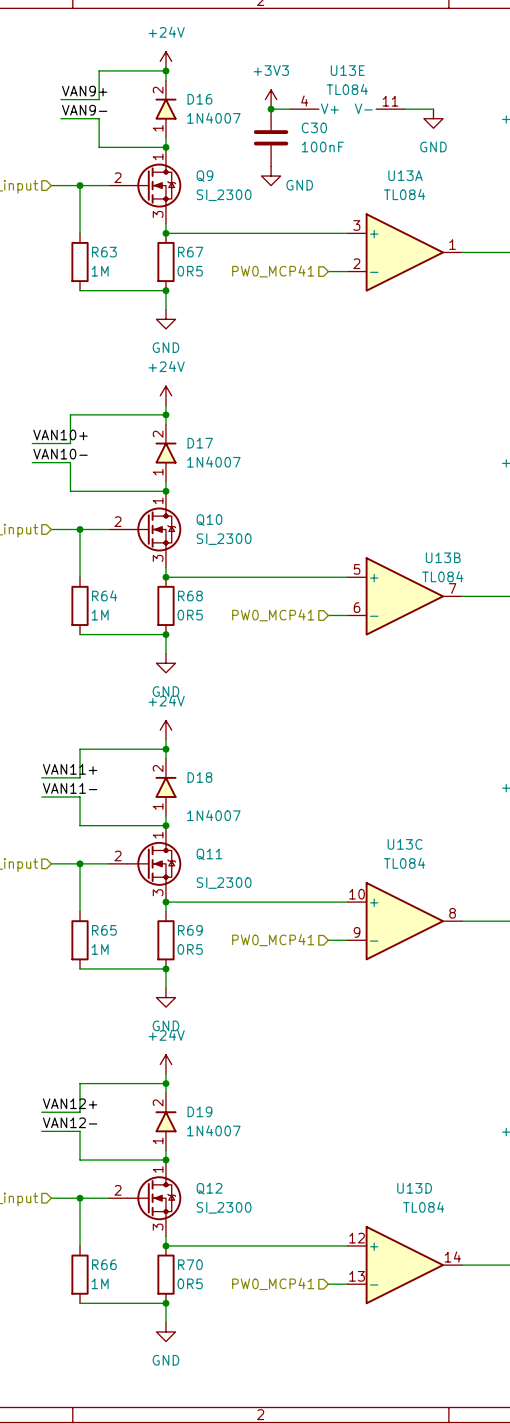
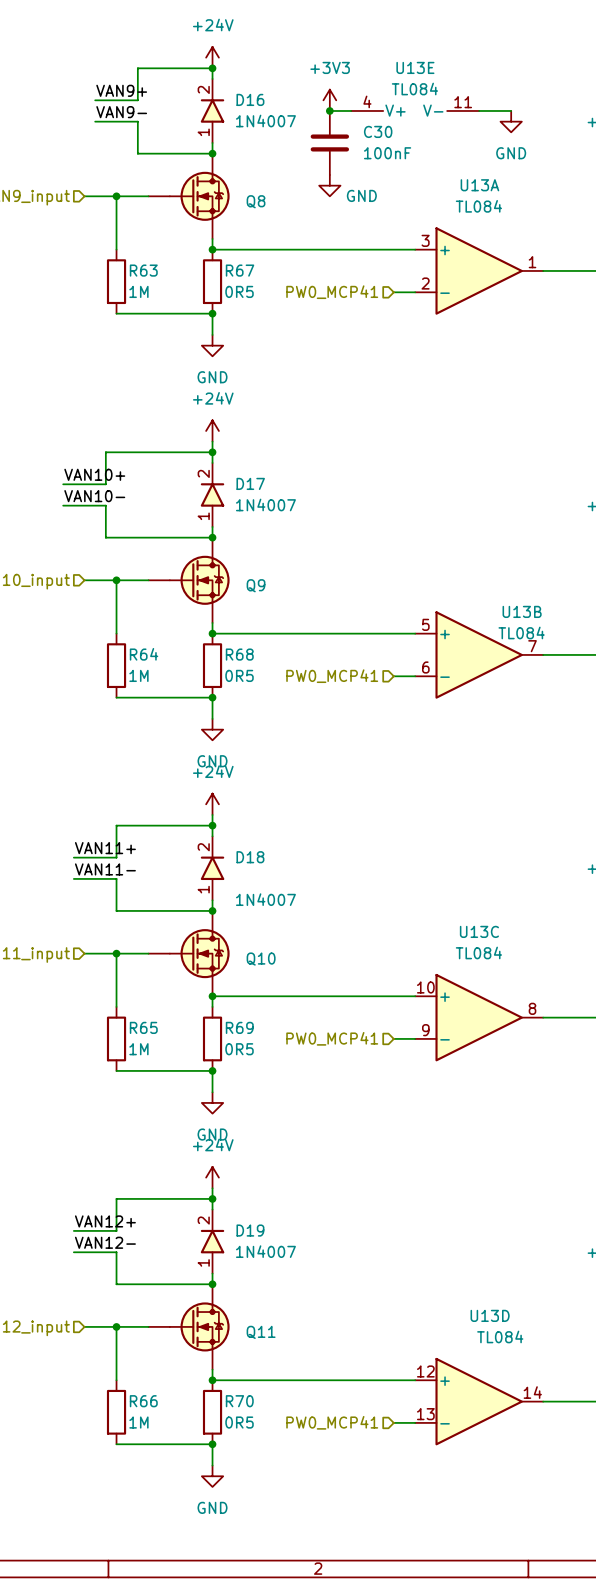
Q9 symbol: [108, 147, 182, 224] -> [148, 537, 230, 623]
Q8: none -> (189, 196)
Q9 value: SI_2300 (224, 195) -> none
Q10 symbol: [108, 491, 182, 568] -> [148, 910, 230, 997]
Q10 value: SI_2300 (224, 539) -> none
Q11 symbol: [108, 825, 182, 903] -> [148, 1284, 230, 1370]
Q11 value: SI_2300 (224, 883) -> none
Q12: SI_2300 (144, 1198) -> none

